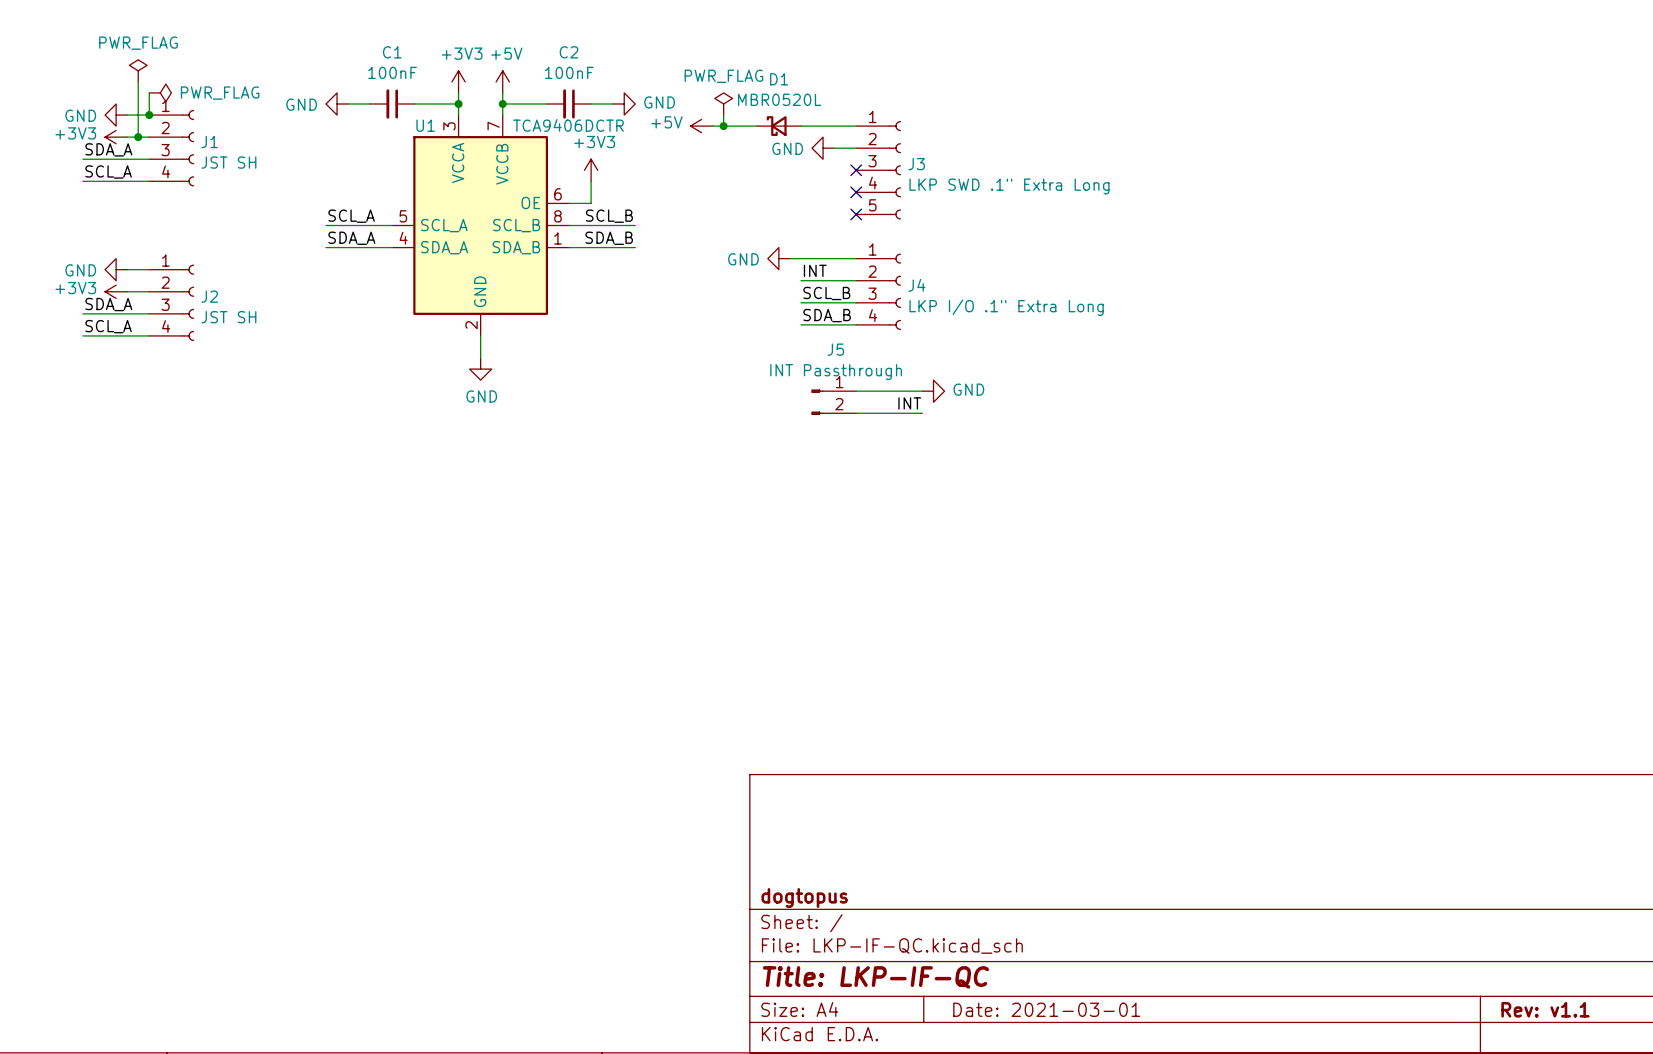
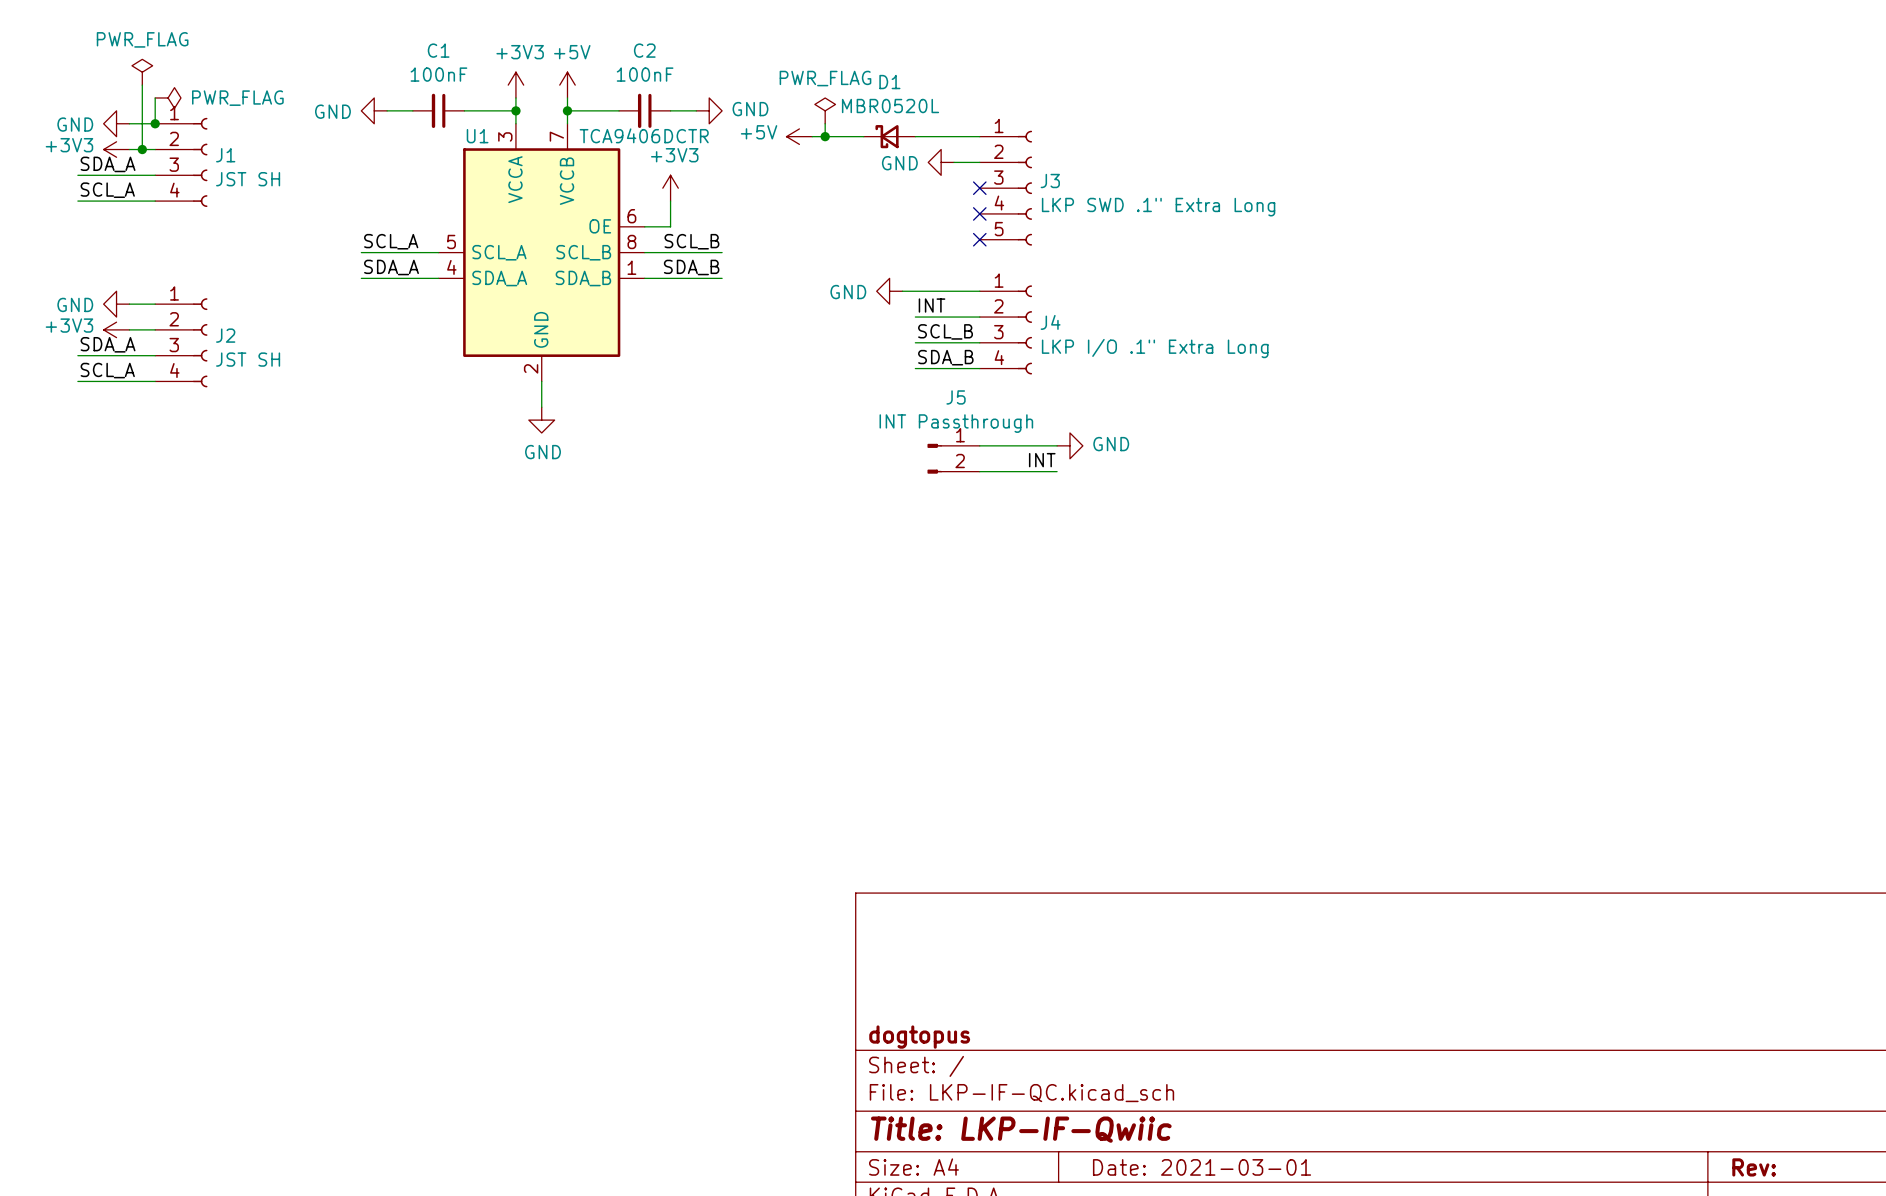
title block: Title: LKP-IF-QC (875, 977) -> Title: LKP-IF-Qwiic (1021, 1129)
title block: Rev: v1.1 (1545, 1009) -> Rev: (1754, 1167)

